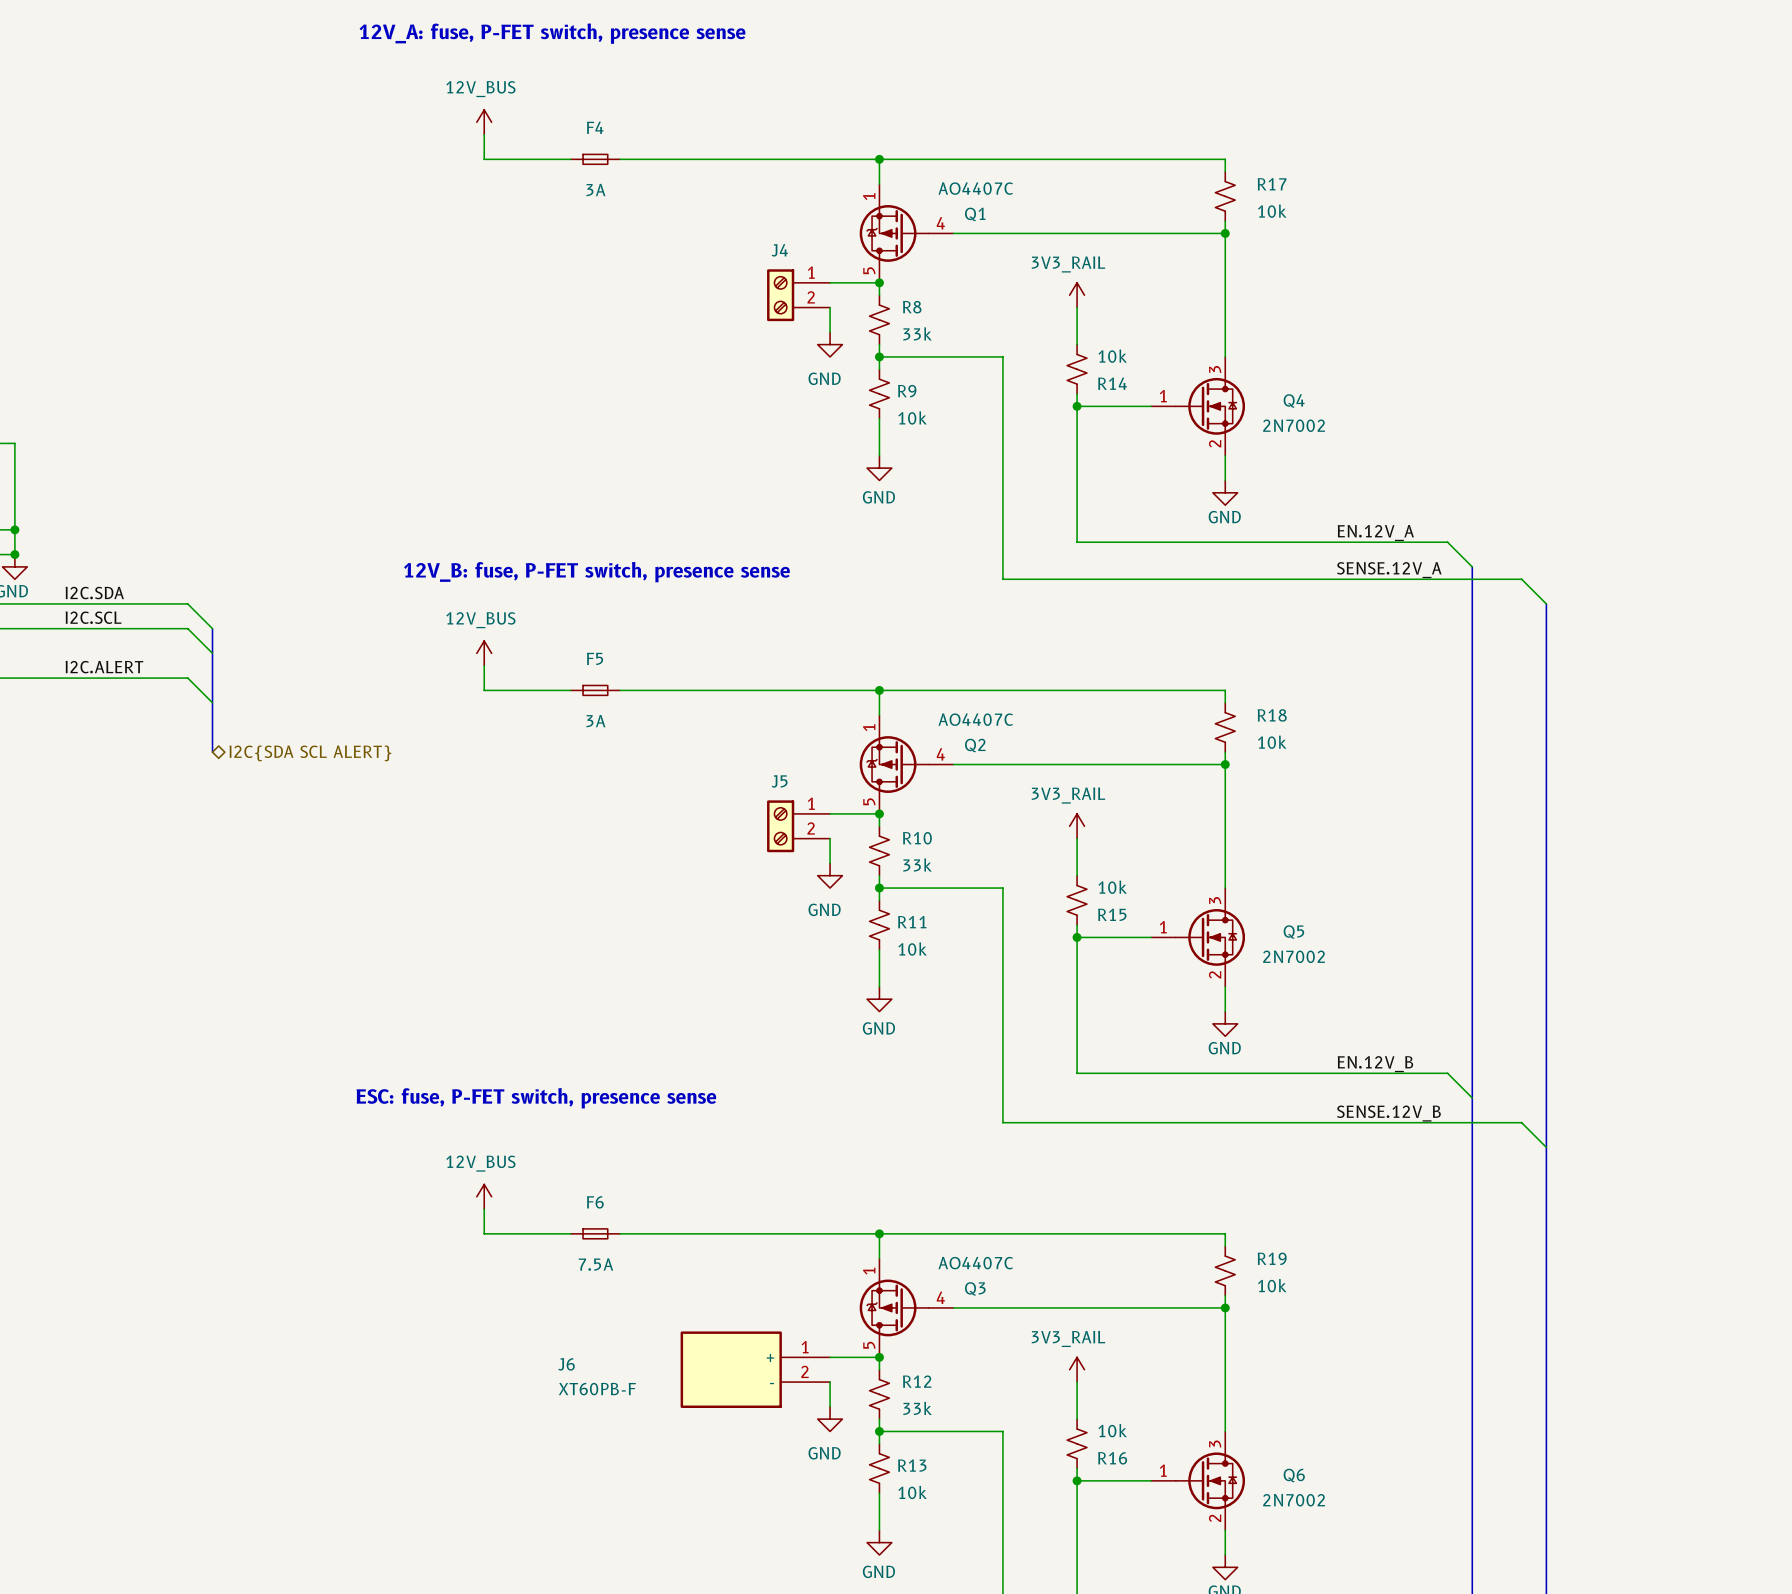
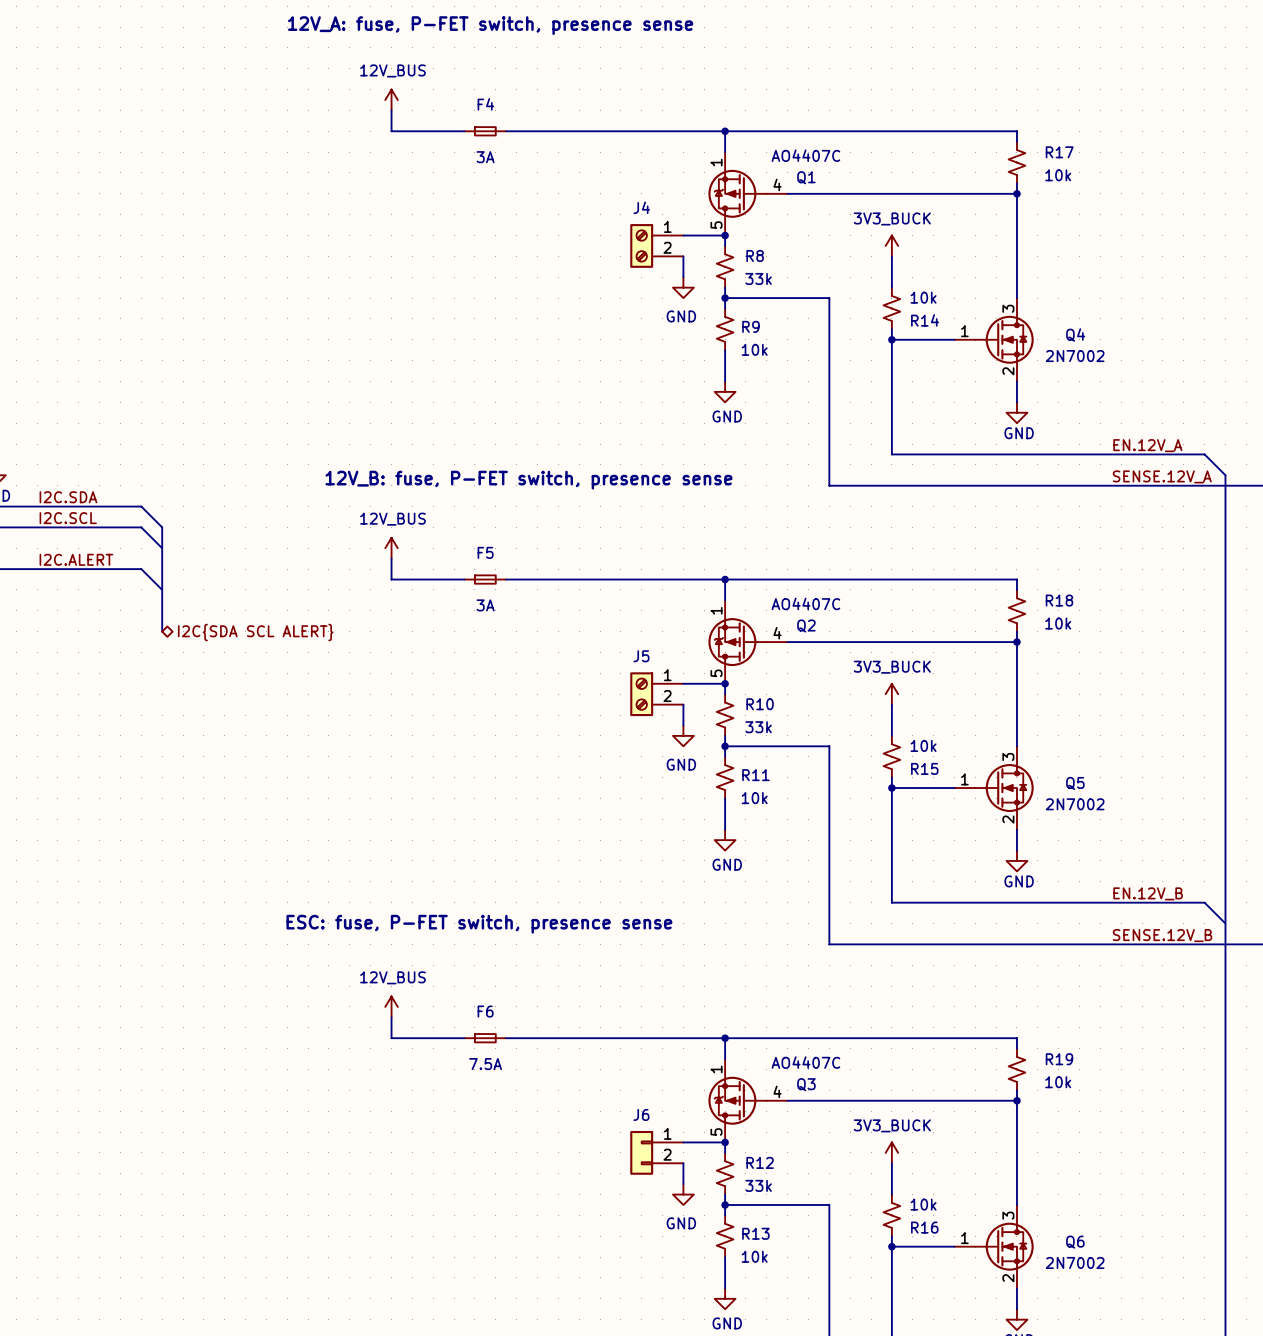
power symbol: 3V3_RAIL (1077, 295) -> 3V3_BUCK (891, 245)
power symbol: 3V3_RAIL (1077, 826) -> 3V3_BUCK (891, 694)
J6 symbol: [680, 1331, 831, 1409] -> [630, 1130, 684, 1175]
J6 name position: J6 (566, 1364) -> J6 (641, 1114)
power symbol: 3V3_RAIL (1077, 1369) -> 3V3_BUCK (891, 1152)
J6 value: XT60PB-F (597, 1389) -> none

